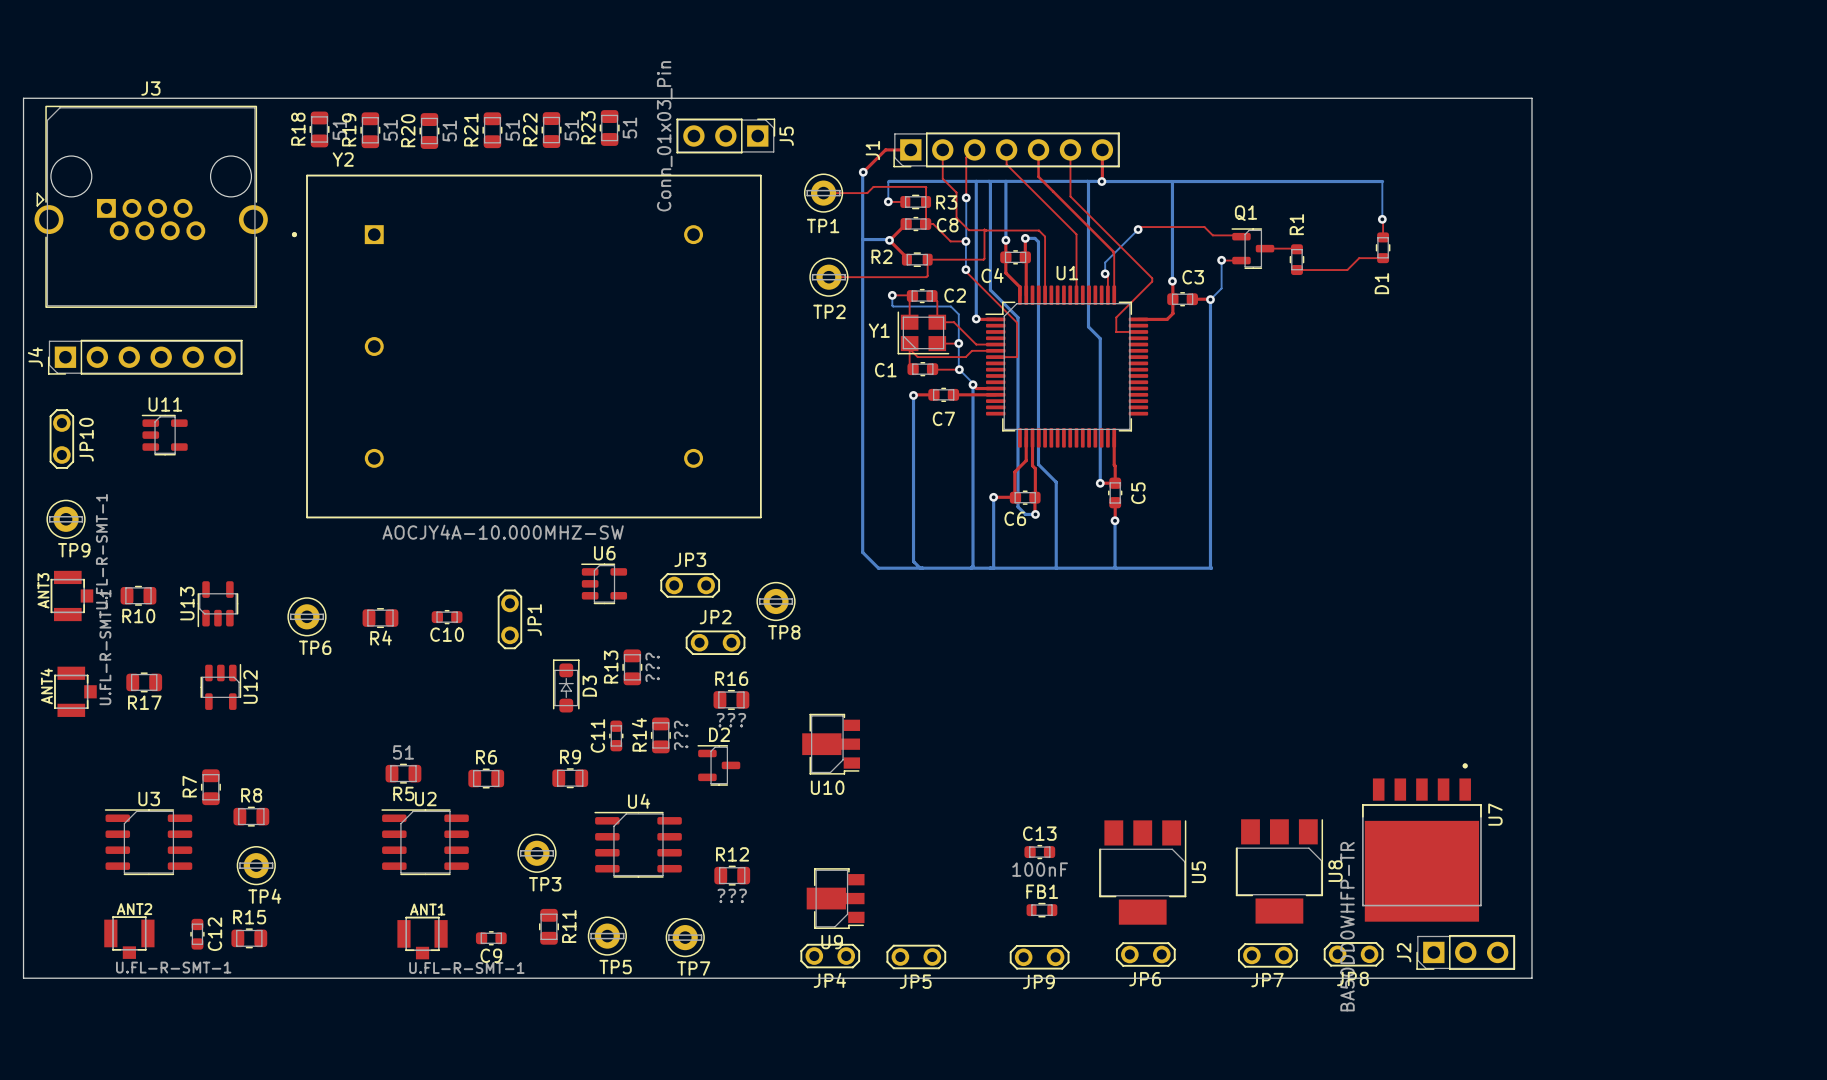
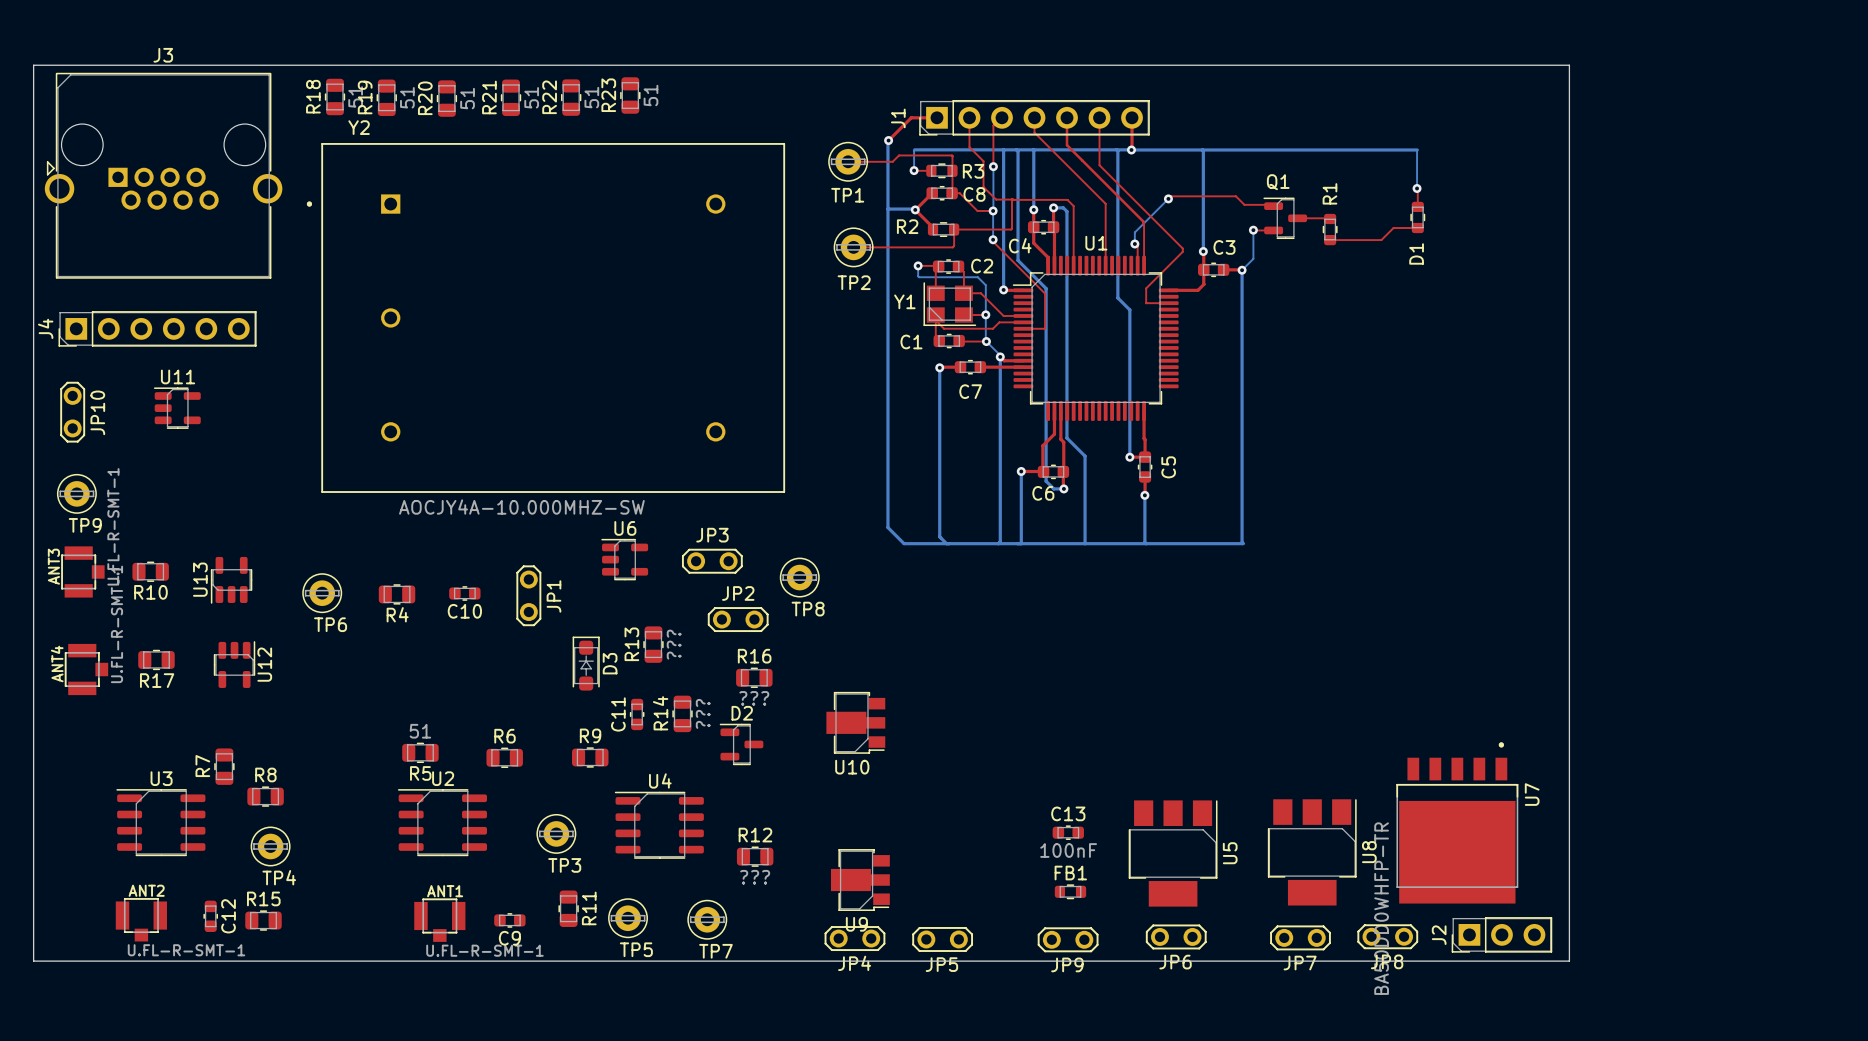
J5: Conn_01x03_Pin (725, 135) -> none

